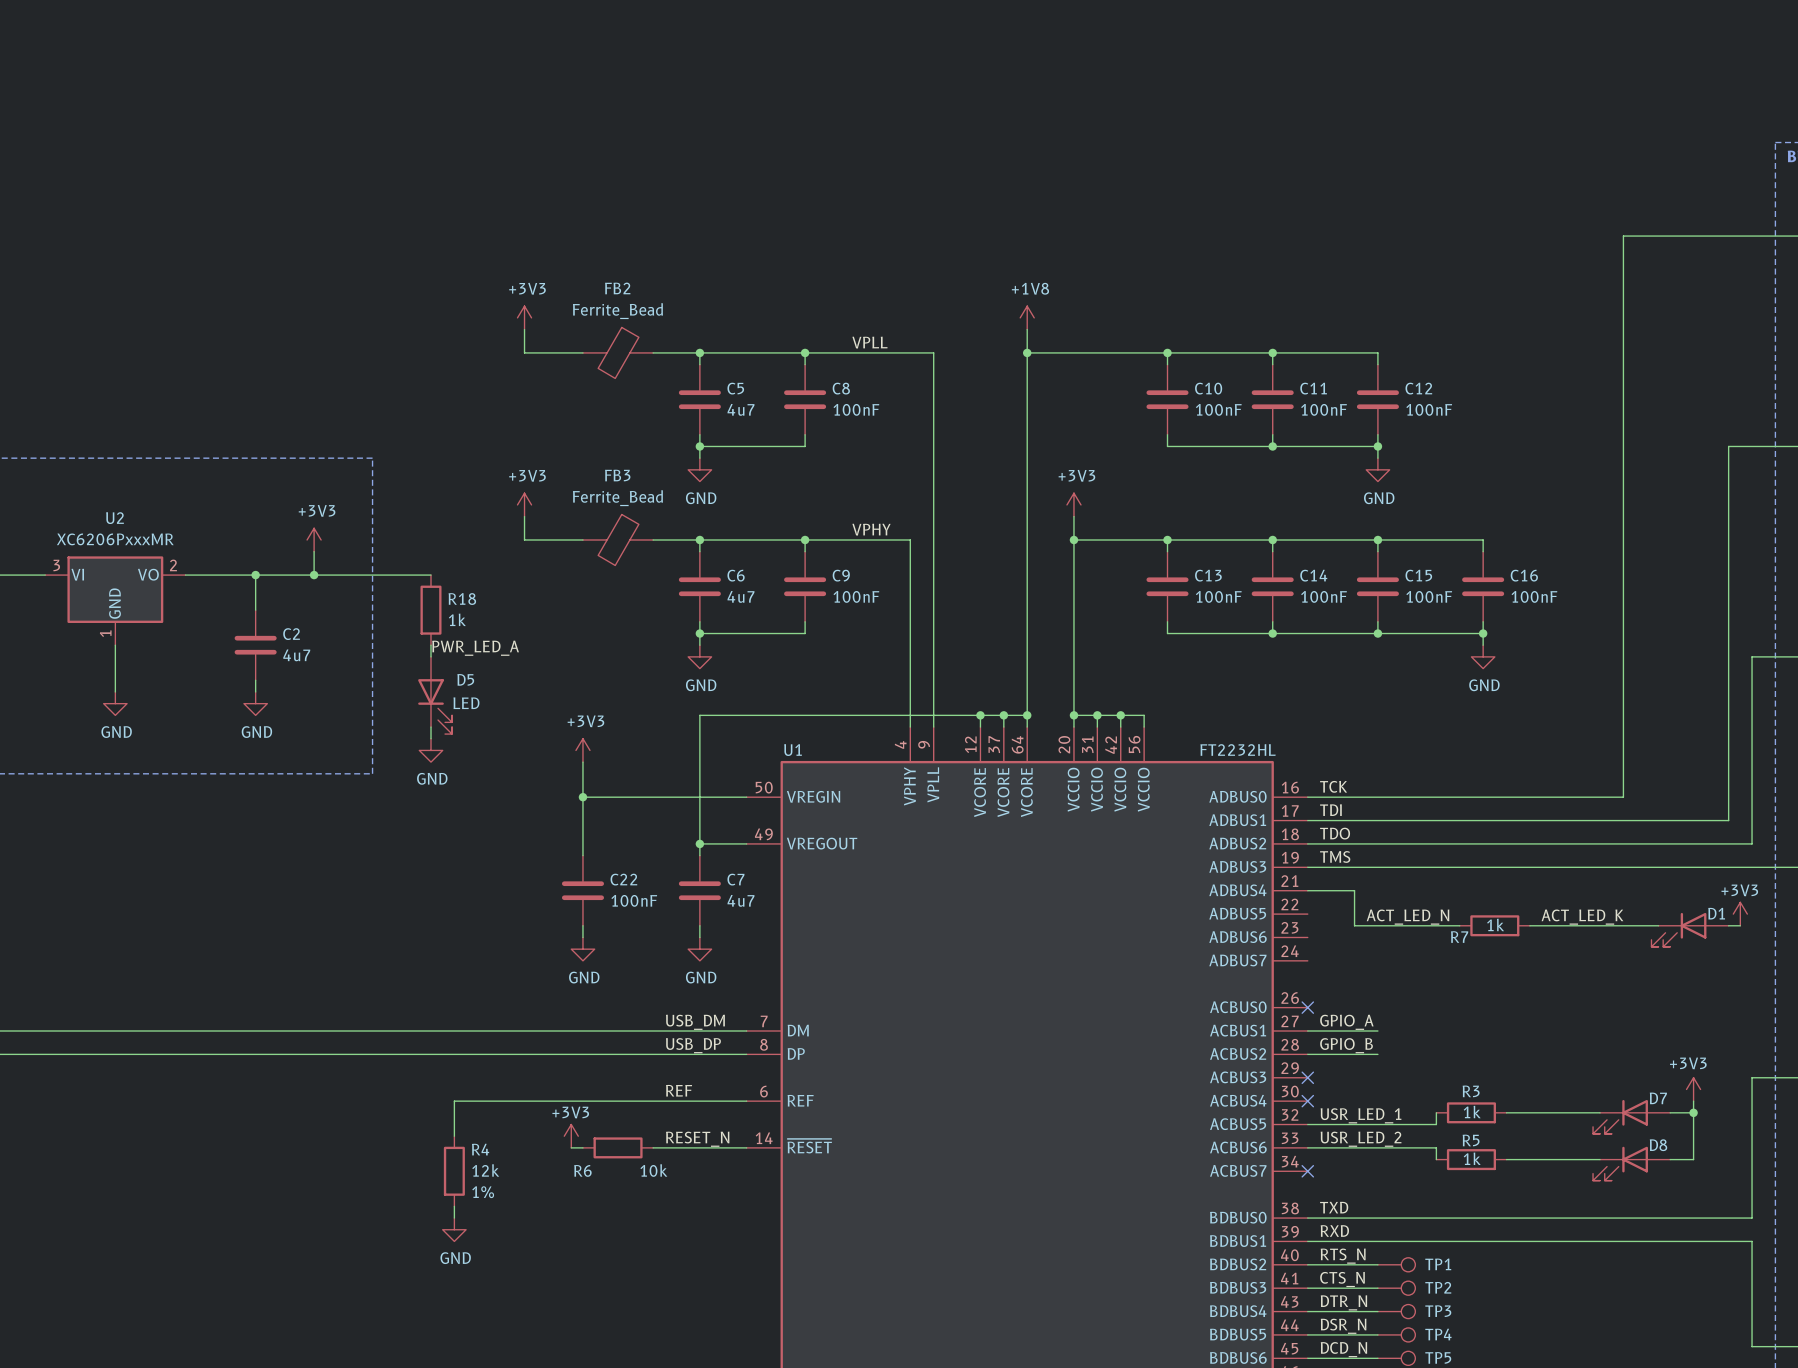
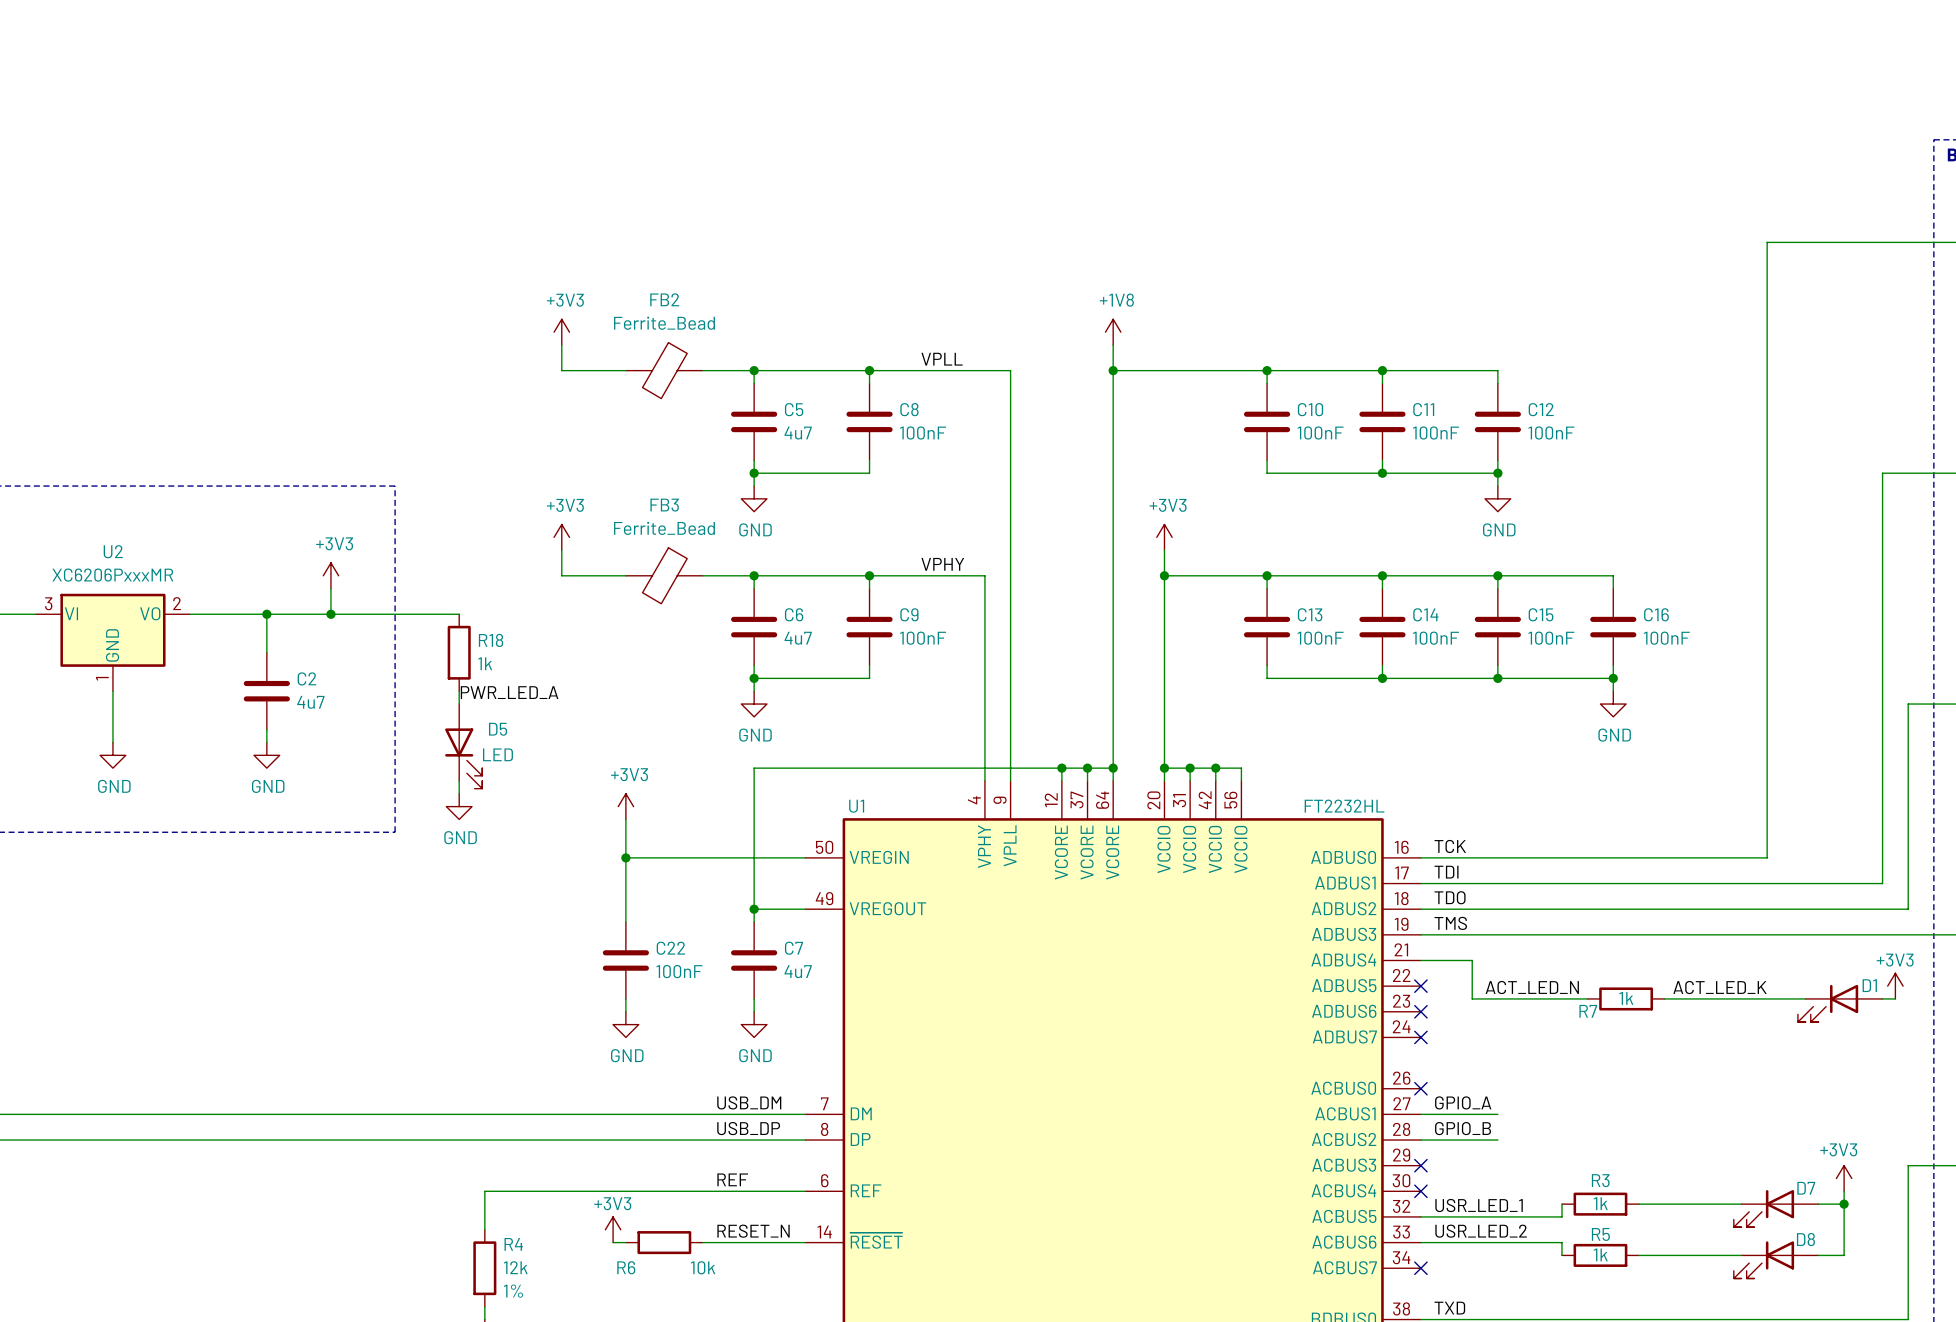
no-connect mark: none -> (1420, 986)
no-connect mark: none -> (1420, 1011)
no-connect mark: none -> (1420, 1037)

